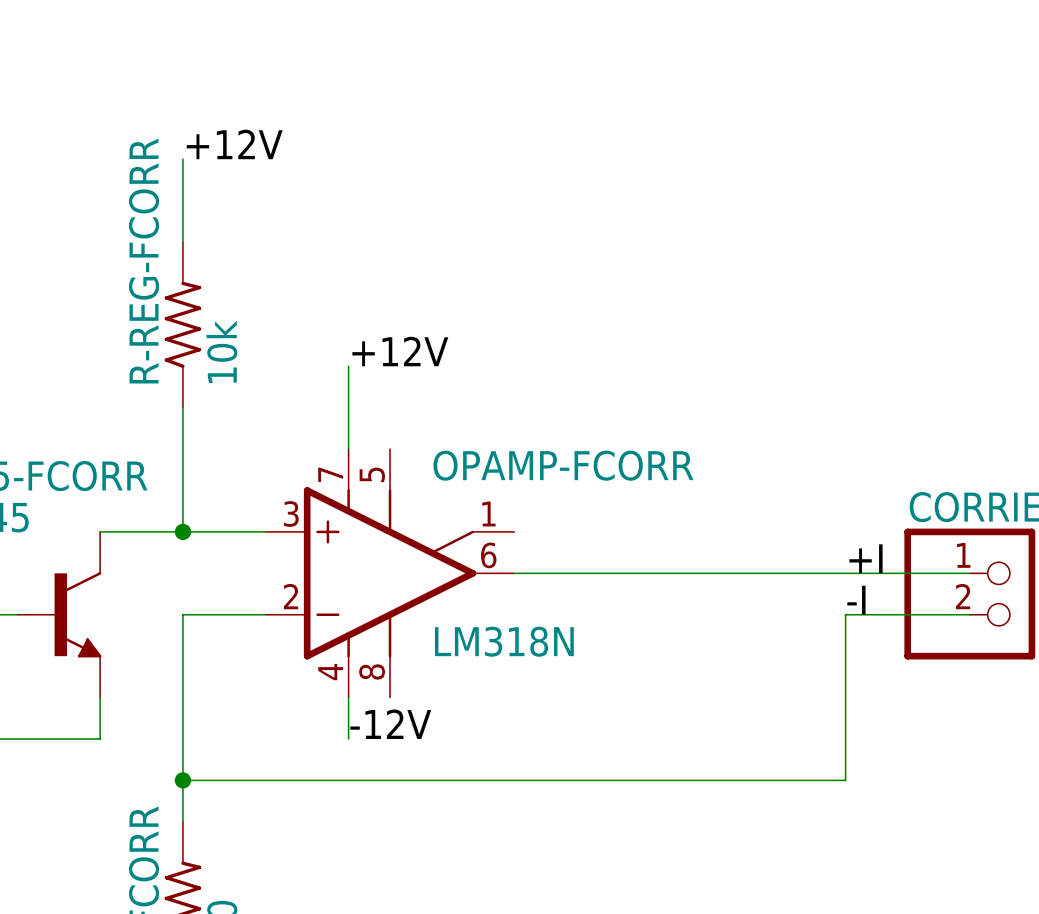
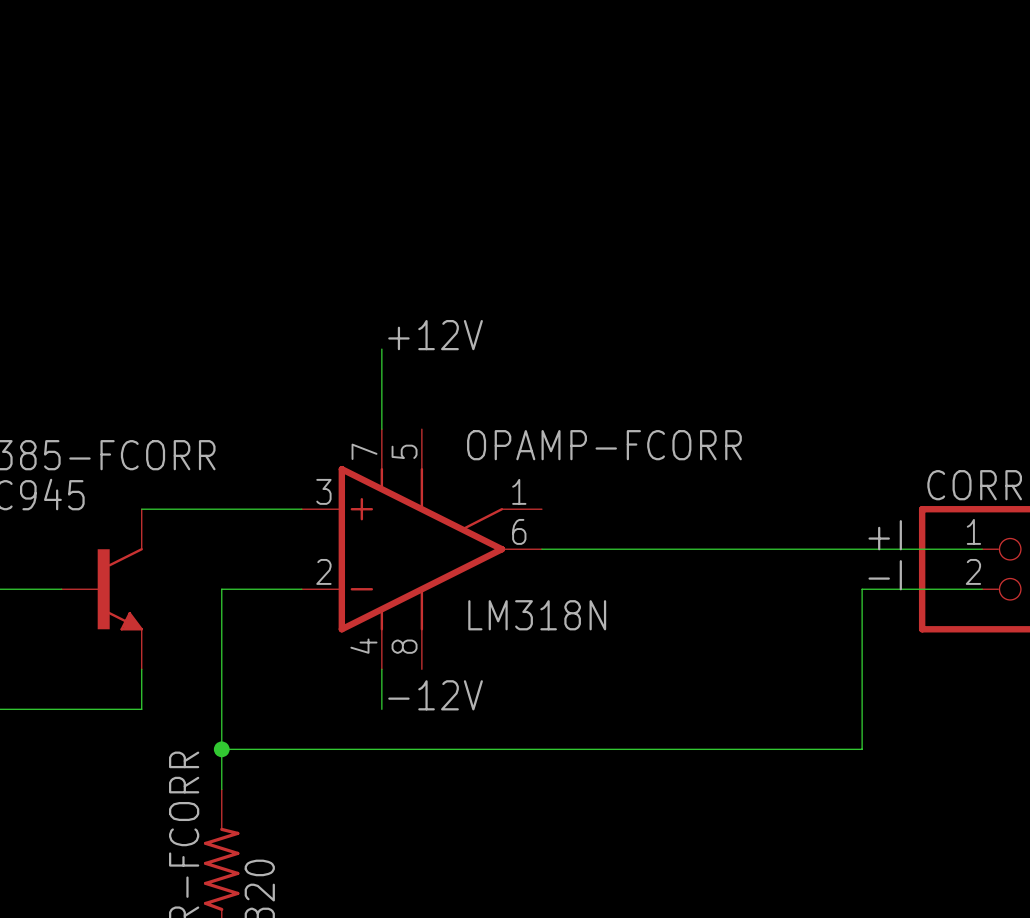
label: +12V (234, 144) -> none
wire: (182, 159) (182, 242) -> none
R-REG-FCORR: 10k (182, 324) -> none
wire: (182, 407) (182, 531) -> none
junction: (182, 531) -> none

